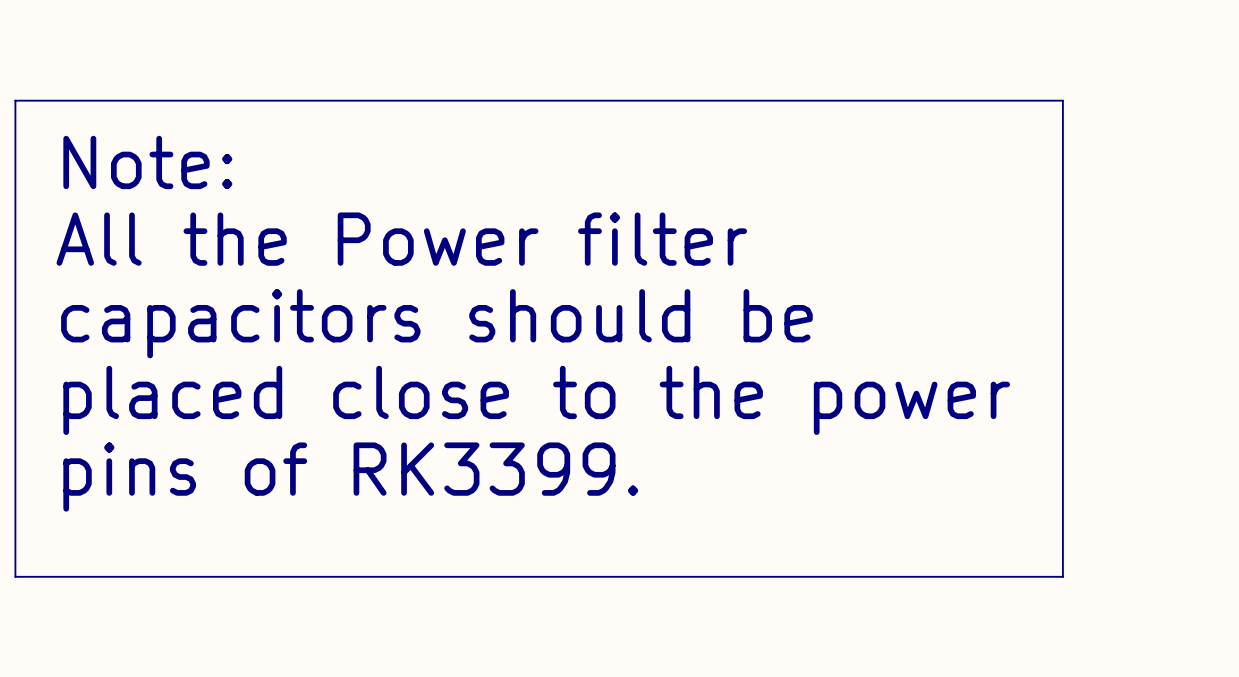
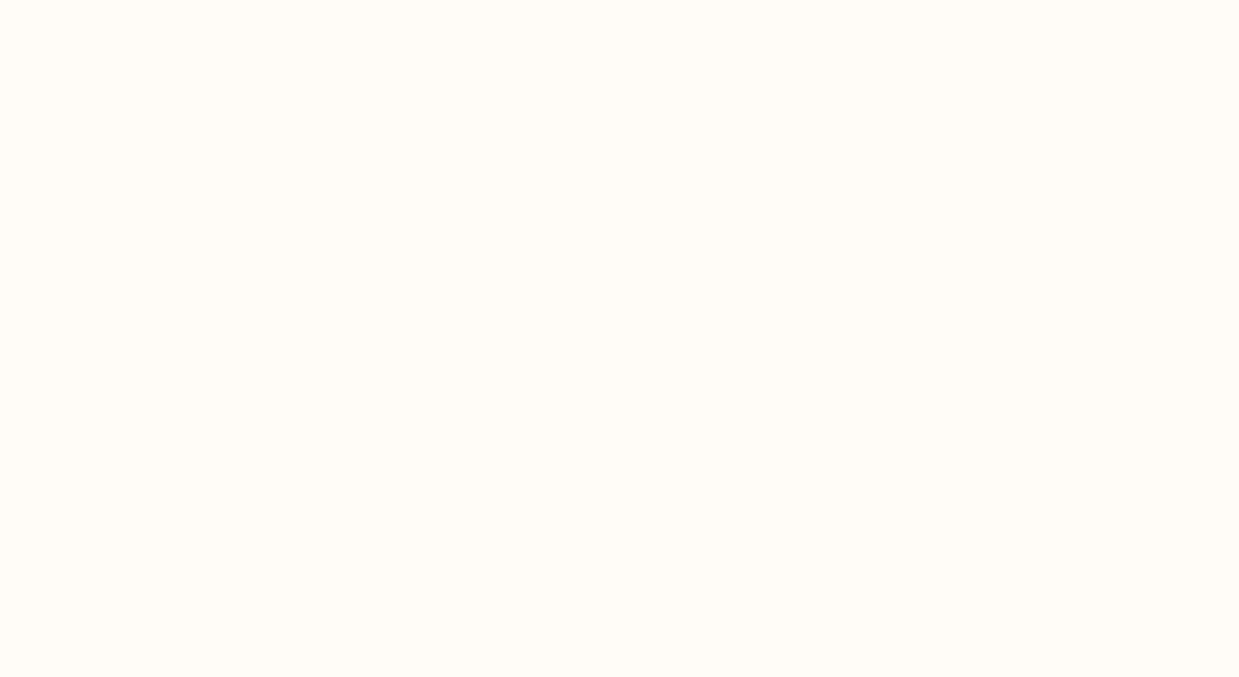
line: (15, 100) (1062, 100) (1062, 576) (15, 576) (15, 100) -> none
text: Note: (147, 162) -> none
text: All the Power filter (401, 239) -> none
text: capacitors should be (436, 323) -> none
text: placed close to the power (536, 400) -> none
text: pins of RK3399. (350, 477) -> none

